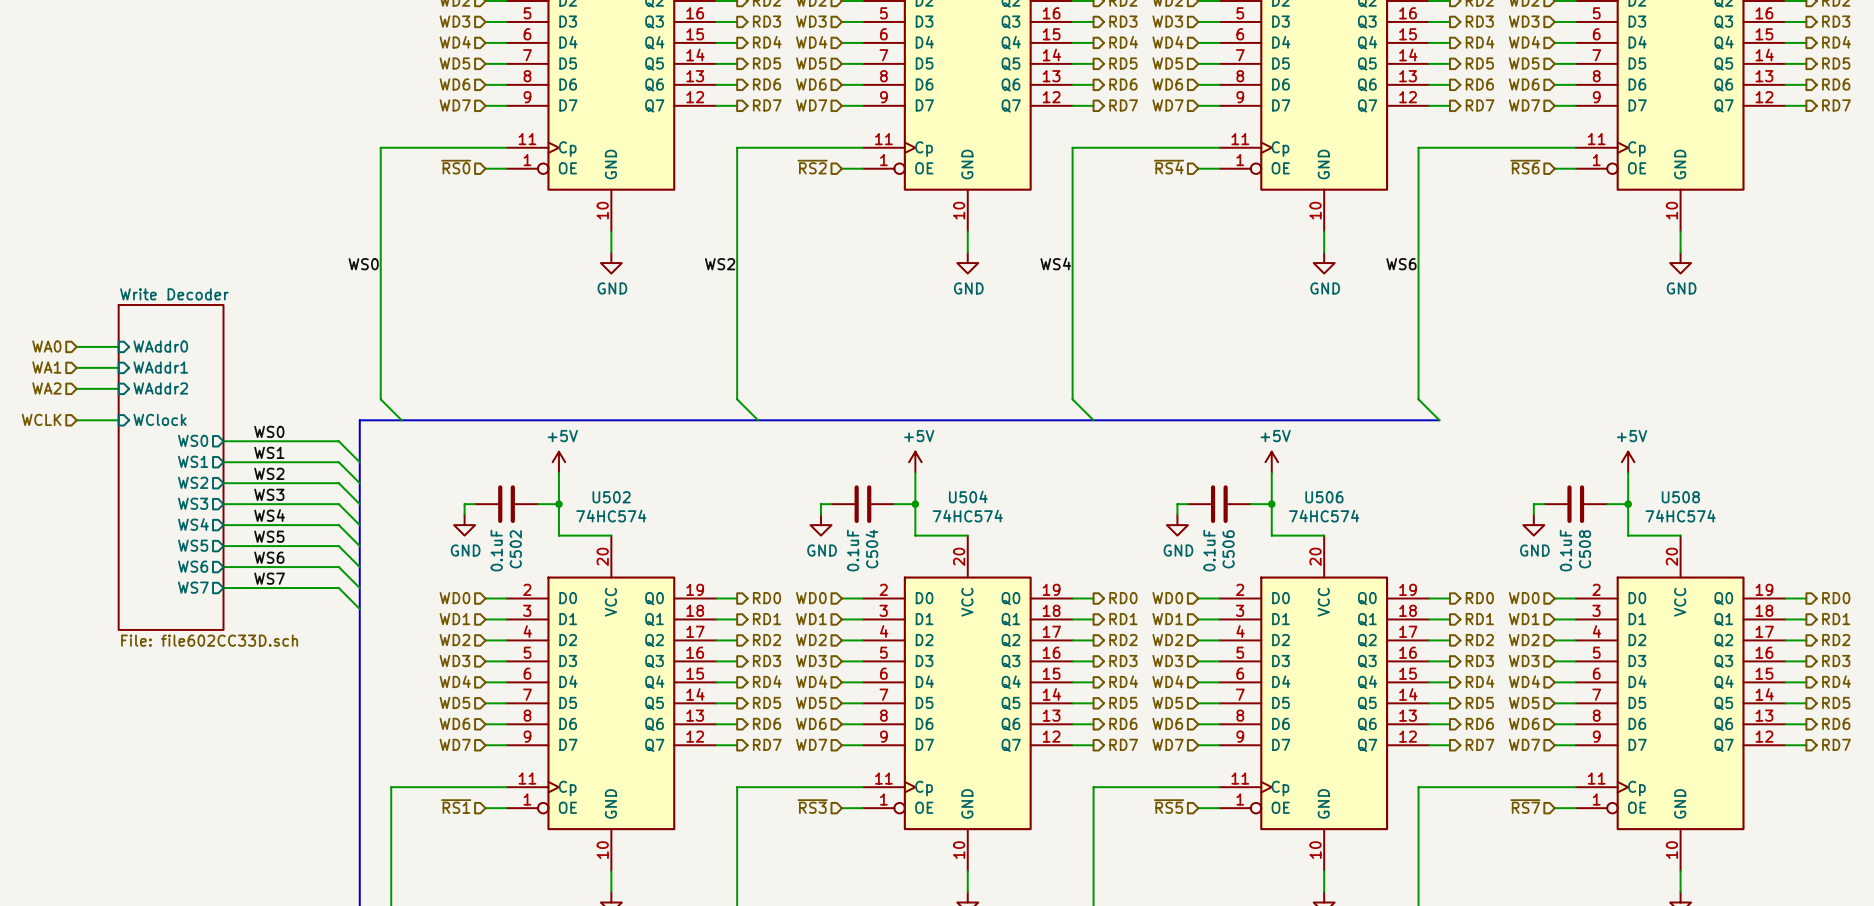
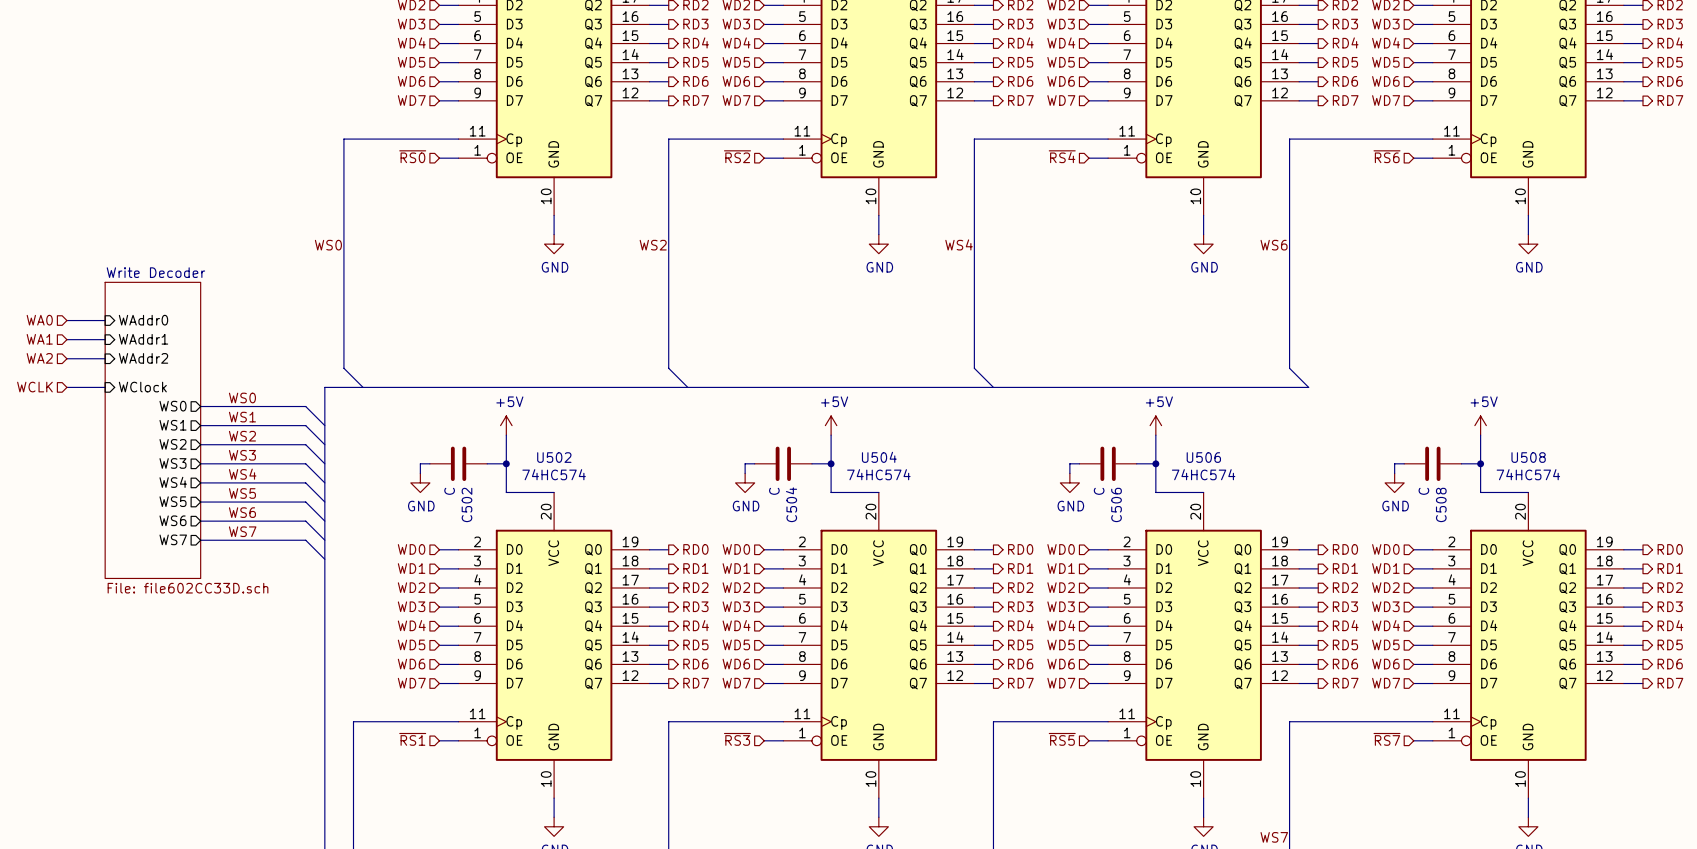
C502 value: 0.1uF (496, 550) -> C (449, 491)
C504 value: 0.1uF (853, 550) -> C (774, 491)
C506 value: 0.1uF (1209, 550) -> C (1099, 491)
C508 value: 0.1uF (1565, 550) -> C (1423, 491)

